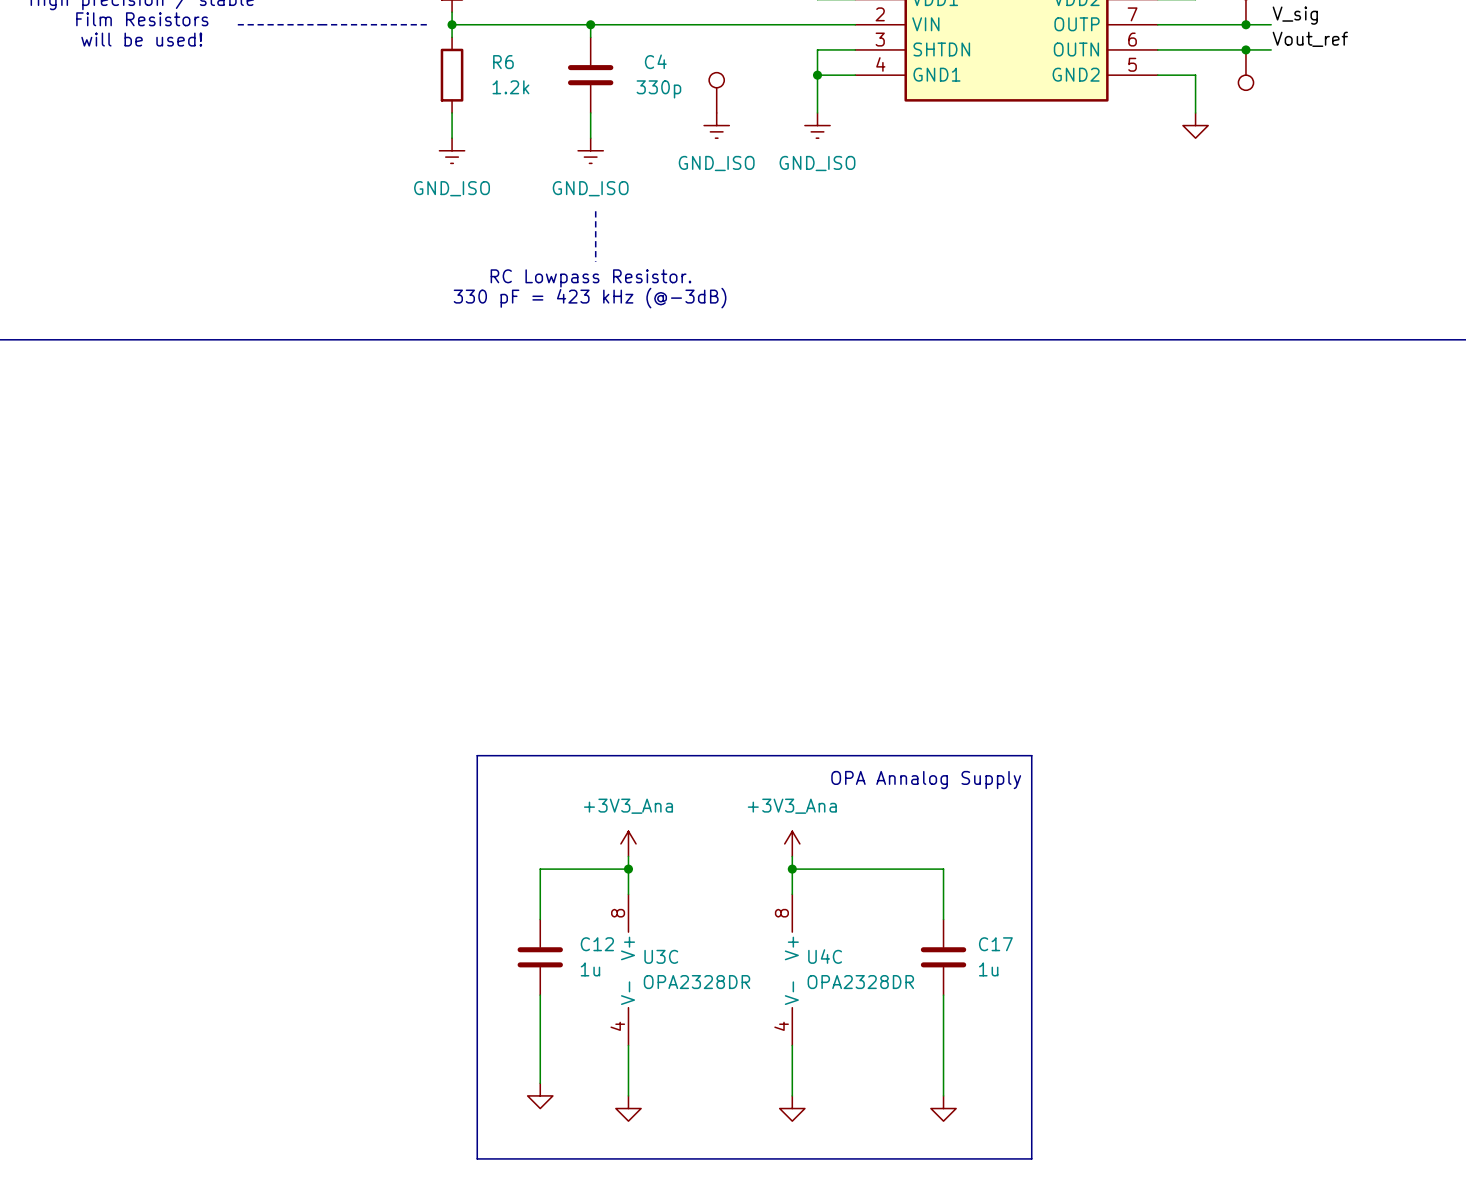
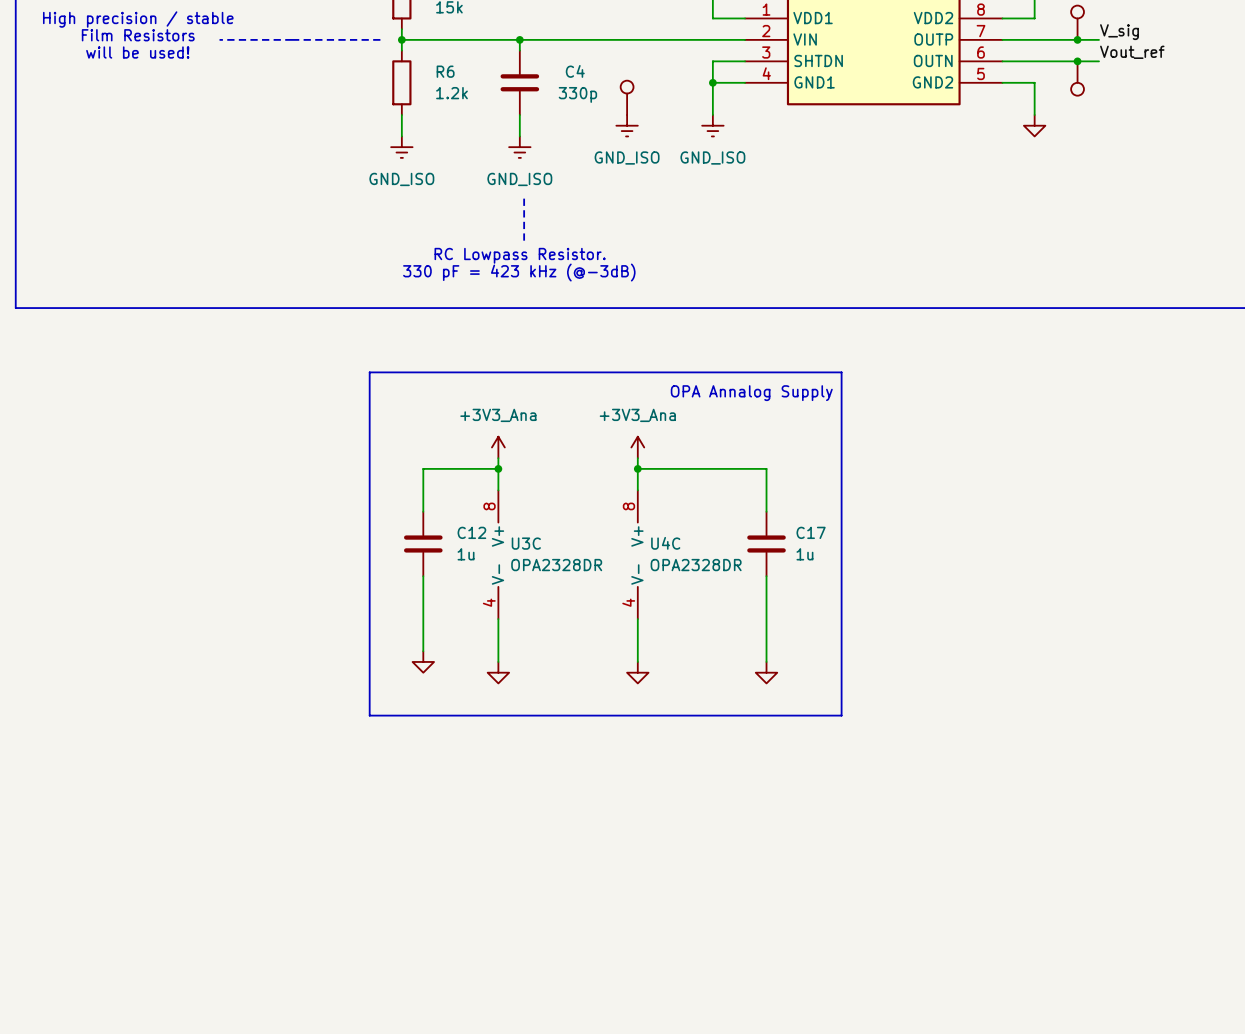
line: none -> (369, 372) (841, 372) (841, 715) (369, 715) (369, 372)
text: none -> OPA Annalog Supply (751, 393)
power symbol: none -> +3V3_Ana (498, 447)
power symbol: none -> +3V3_Ana (637, 447)
wire: none -> (498, 458) (498, 490)
wire: none -> (637, 458) (637, 490)
wire: none -> (498, 468) (423, 468) (423, 511)
junction: none -> (498, 468)
wire: none -> (637, 468) (766, 468) (766, 511)
junction: none -> (637, 468)
wire: none -> (423, 576) (423, 651)
wire: none -> (766, 576) (766, 661)
wire: none -> (498, 619) (498, 661)
wire: none -> (637, 619) (637, 661)
line: (477, 755) (1031, 755) (1031, 1158) (477, 1158) (477, 755) -> none
power symbol: none -> (423, 661)
power symbol: none -> (498, 672)
power symbol: none -> (637, 672)
power symbol: none -> (766, 672)
text: OPA Annalog Supply (926, 780) -> none
power symbol: +3V3_Ana (628, 843) -> none
power symbol: +3V3_Ana (792, 843) -> none
wire: (628, 856) (628, 894) -> none
wire: (792, 856) (792, 894) -> none
wire: (628, 869) (540, 869) (540, 919) -> none
junction: (628, 869) -> none
wire: (792, 869) (943, 869) (943, 919) -> none
junction: (792, 869) -> none
C12 position: (540, 957) -> (423, 543)
C17 position: (943, 957) -> (766, 543)
U3C position: (628, 969) -> (498, 554)
U4C position: (792, 969) -> (637, 554)
wire: (540, 995) (540, 1083) -> none
wire: (943, 995) (943, 1095) -> none
wire: (628, 1045) (628, 1095) -> none
wire: (792, 1045) (792, 1095) -> none
power symbol: (540, 1095) -> none
power symbol: (628, 1108) -> none
power symbol: (792, 1108) -> none
power symbol: (943, 1108) -> none

